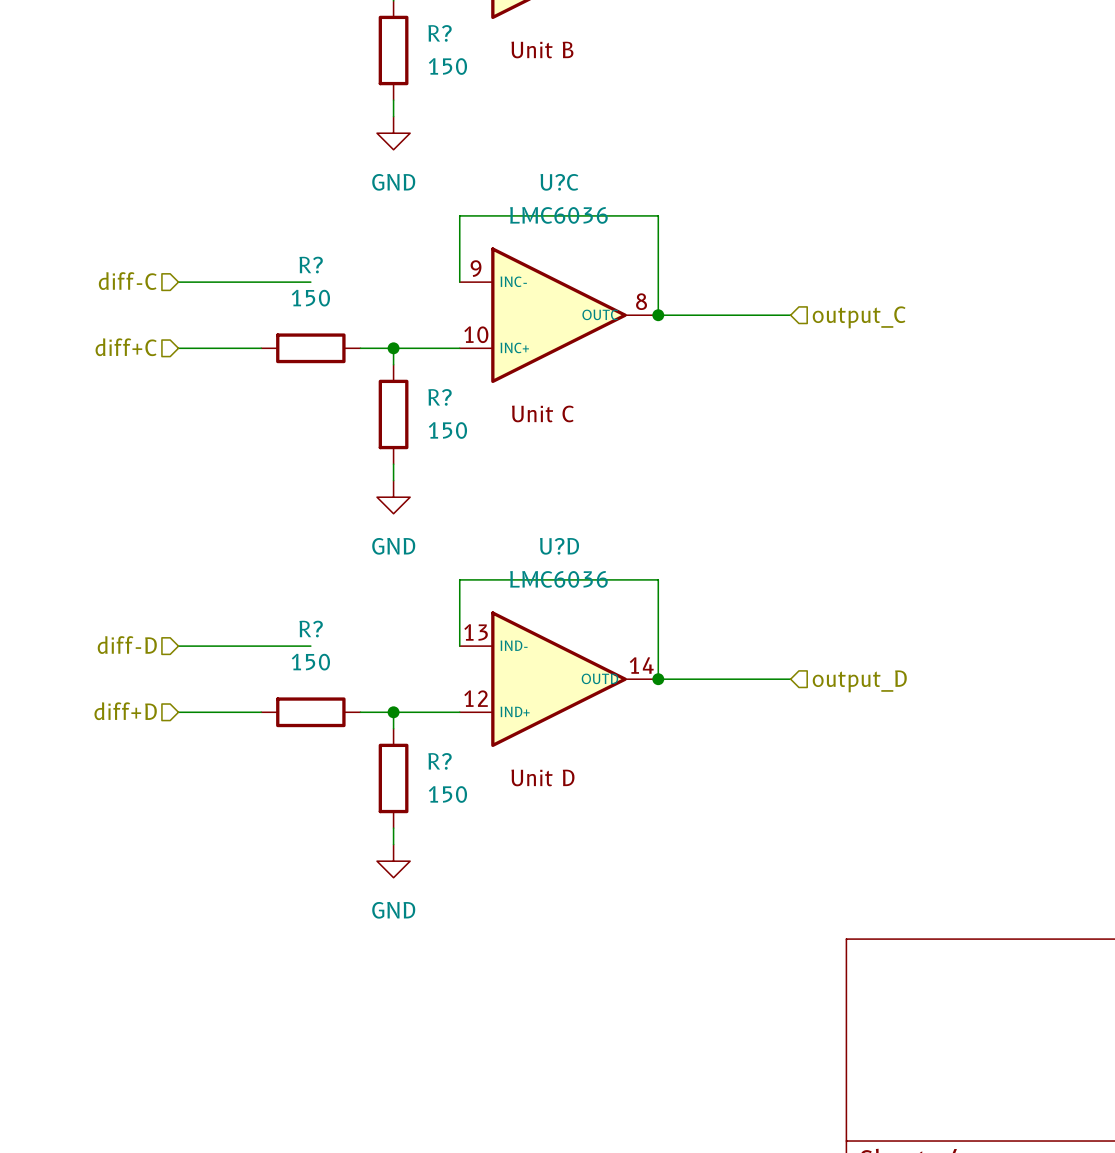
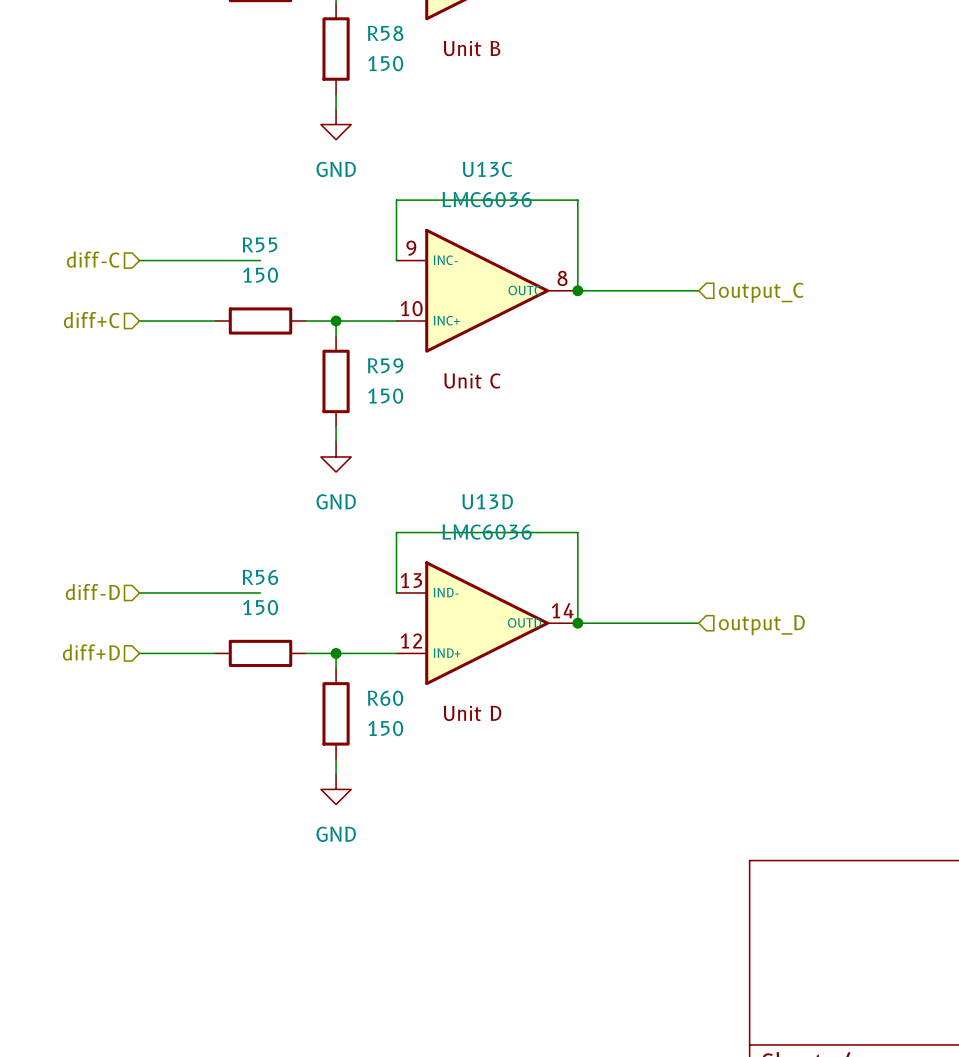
R? name: R? (440, 33) -> R58 (385, 33)
U?C name: U?C (559, 182) -> U13C (487, 169)
R? name: R? (311, 265) -> R55 (260, 244)
R? name: R? (440, 397) -> R59 (385, 365)
U?D name: U?D (559, 546) -> U13D (487, 501)
R? name: R? (311, 629) -> R56 (260, 577)
R? name: R? (440, 761) -> R60 (385, 698)

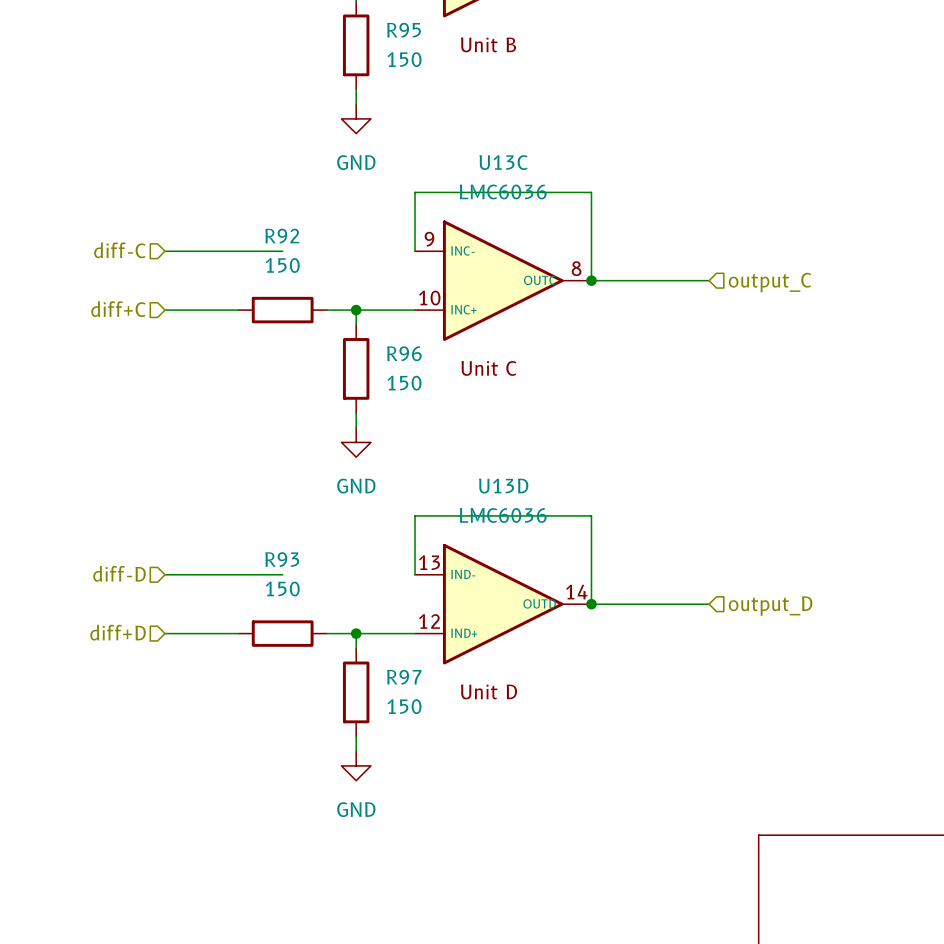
R58 name: R58 (385, 33) -> R95 (404, 30)
R55 name: R55 (260, 244) -> R92 (282, 236)
R59 name: R59 (385, 365) -> R96 (404, 353)
R56 name: R56 (260, 577) -> R93 (282, 559)
R60 name: R60 (385, 698) -> R97 (404, 677)

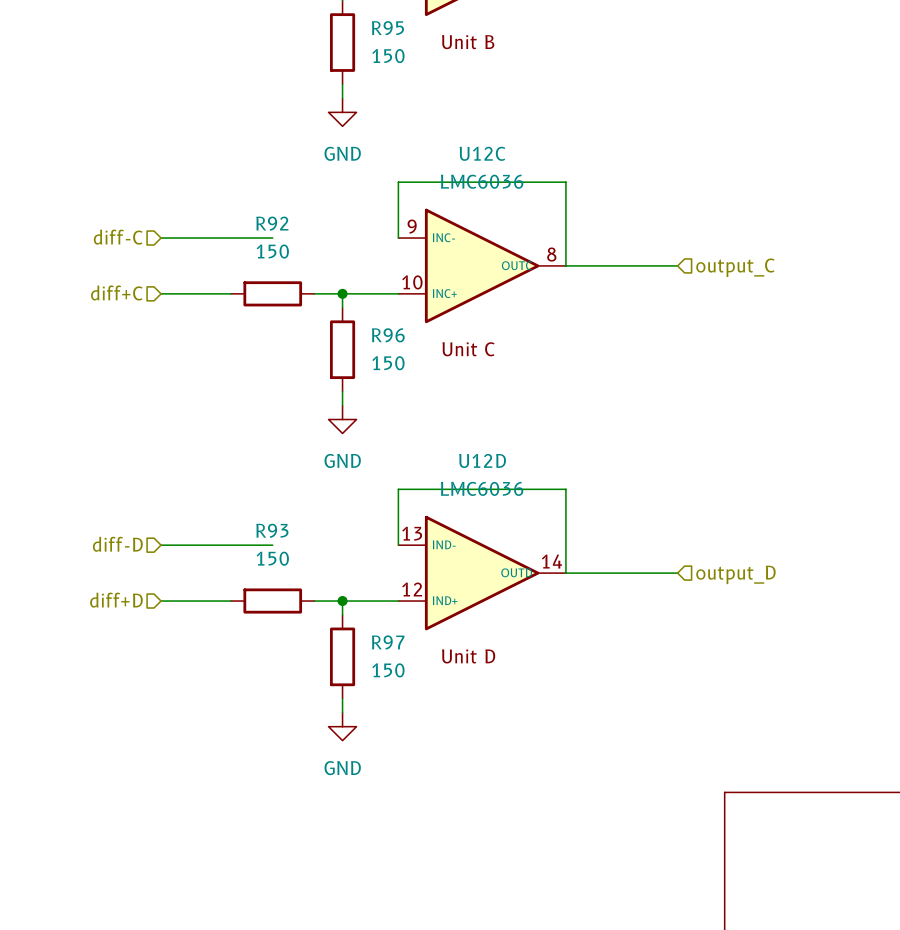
U13C name: U13C (503, 162) -> U12C (482, 153)
junction: (591, 280) -> none
U13D name: U13D (503, 486) -> U12D (482, 460)
junction: (591, 604) -> none

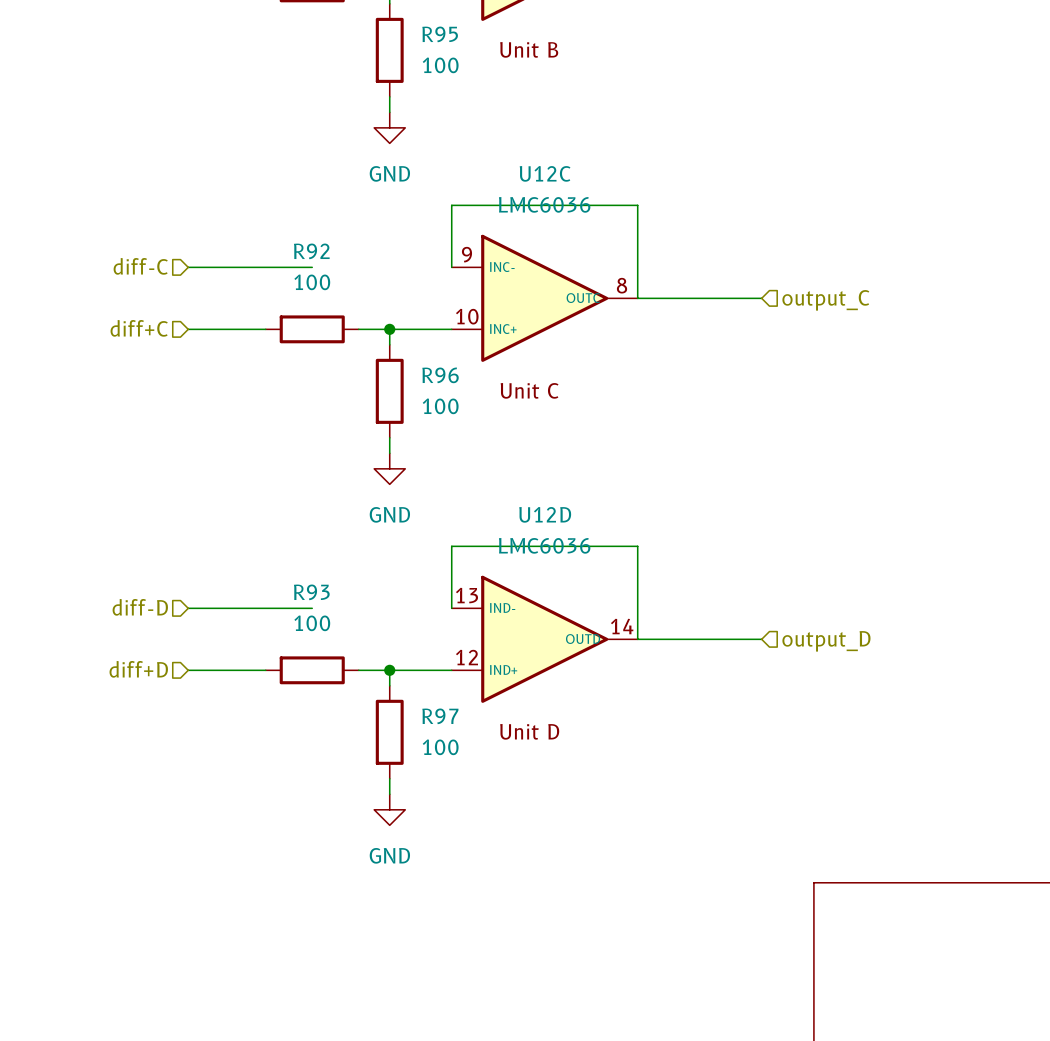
R95 value: 150 (388, 56) -> 100 (440, 65)
R92 value: 150 (272, 251) -> 100 (312, 282)
R96 value: 150 (388, 363) -> 100 (440, 406)
R93 value: 150 (272, 558) -> 100 (312, 623)
R97 value: 150 (388, 670) -> 100 (440, 747)

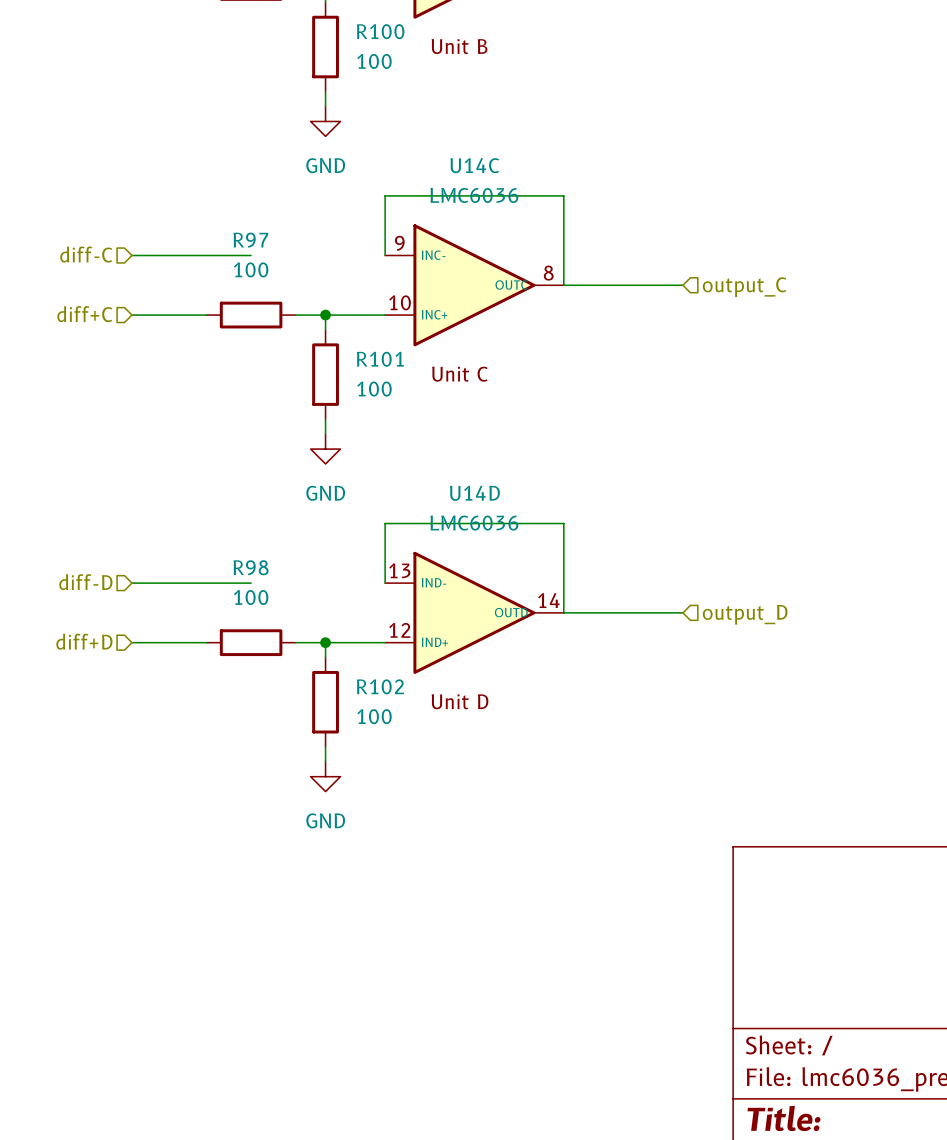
R95 name: R95 (440, 34) -> R100 (380, 31)
U12C name: U12C (545, 173) -> U14C (474, 165)
R92 name: R92 (311, 251) -> R97 (250, 240)
R96 name: R96 (440, 375) -> R101 (380, 359)
U12D name: U12D (545, 514) -> U14D (474, 493)
R93 name: R93 (311, 592) -> R98 (251, 567)
R97 name: R97 (440, 716) -> R102 (380, 686)

